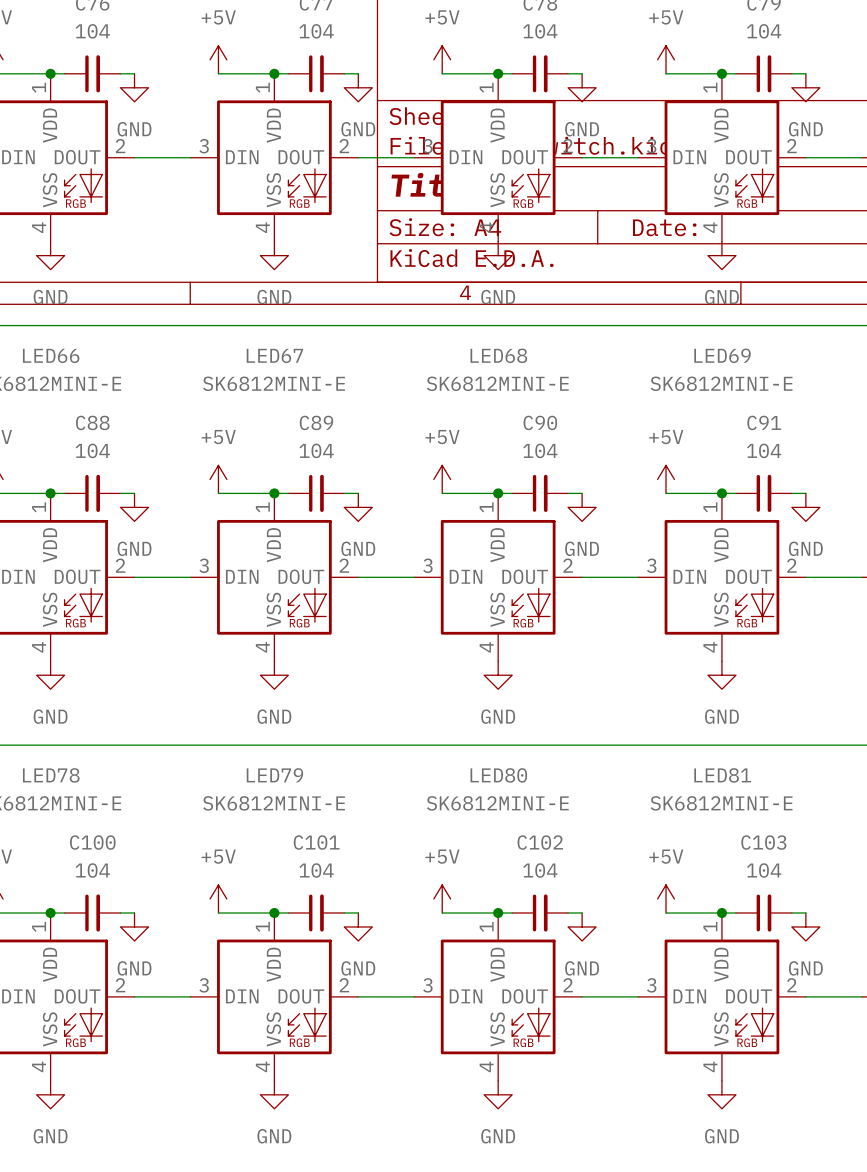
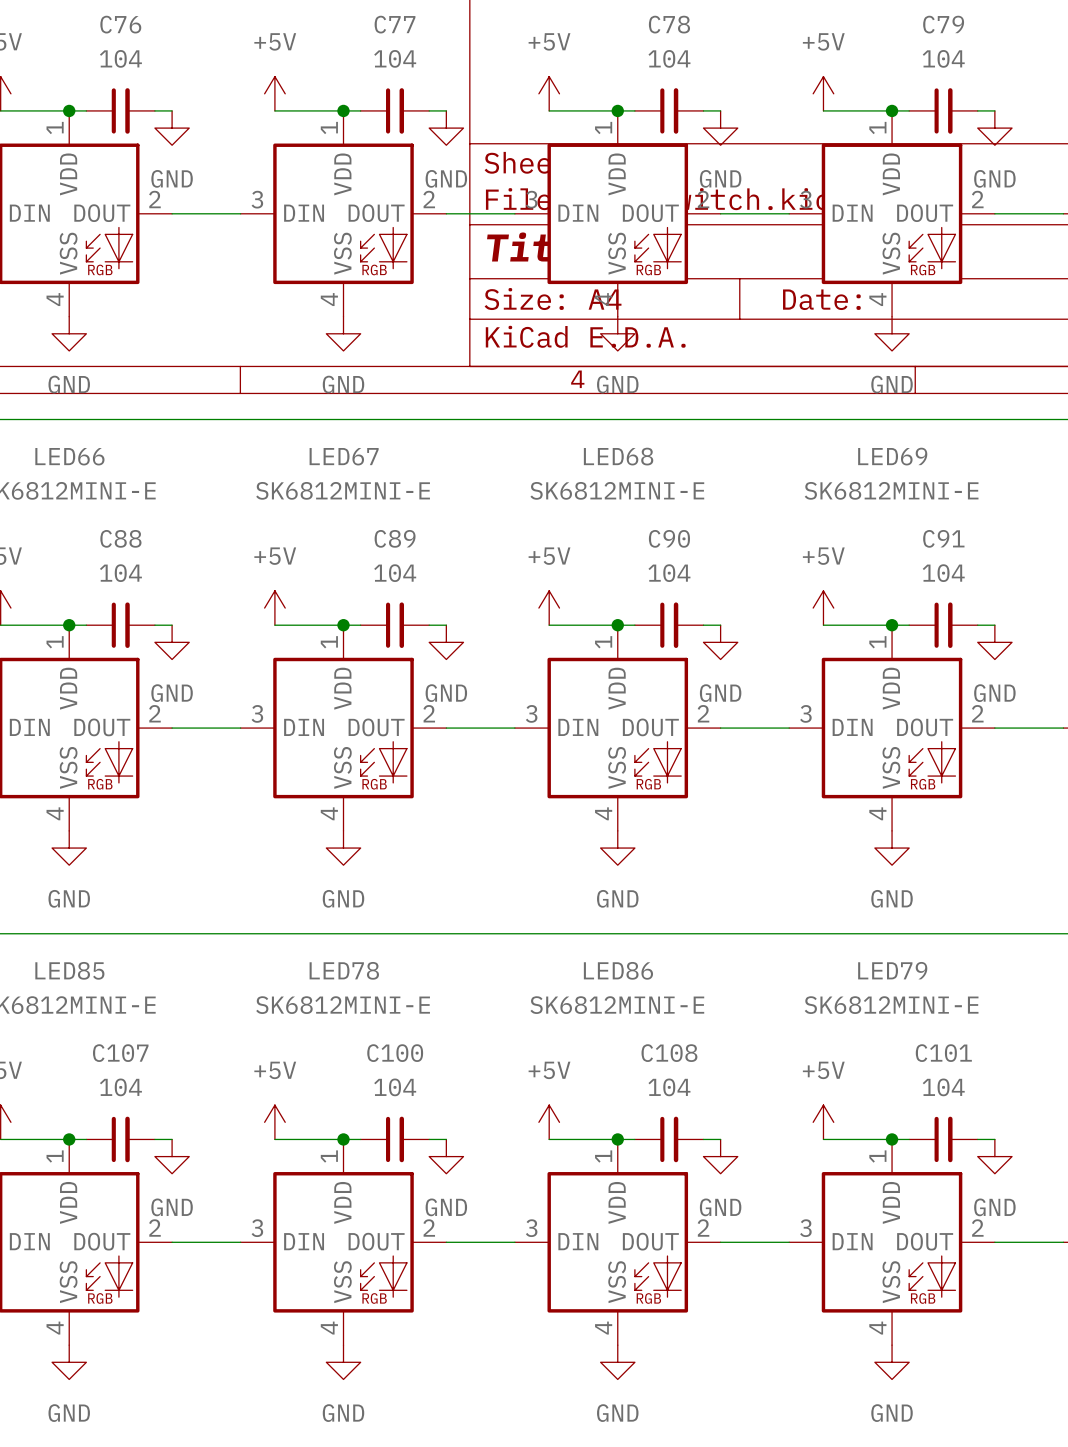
LED78 name: LED78 (51, 775) -> LED85 (69, 970)
LED79 name: LED79 (274, 775) -> LED78 (344, 970)
LED80 name: LED80 (498, 775) -> LED86 (618, 970)
LED81 name: LED81 (722, 775) -> LED79 (892, 970)
C100 name: C100 (92, 842) -> C107 (120, 1053)
C101 name: C101 (316, 842) -> C100 (395, 1053)
C102 name: C102 (540, 842) -> C108 (669, 1053)
C103 name: C103 (763, 842) -> C101 (943, 1053)

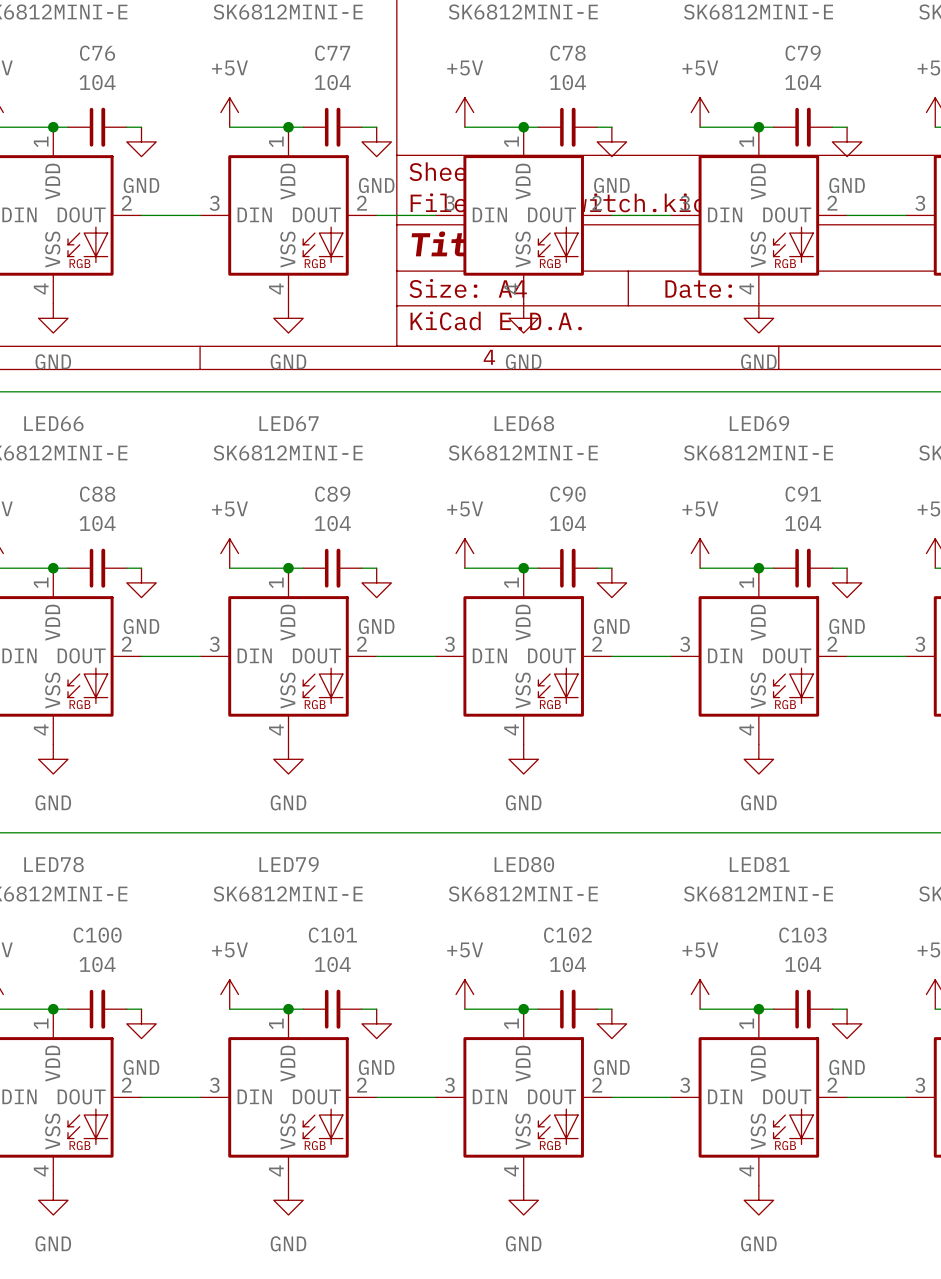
LED85 name: LED85 (69, 970) -> LED78 (53, 864)
LED78 name: LED78 (344, 970) -> LED79 (289, 864)
LED86 name: LED86 (618, 970) -> LED80 (524, 864)
LED79 name: LED79 (892, 970) -> LED81 (759, 864)
C107 name: C107 (120, 1053) -> C100 (97, 935)
C100 name: C100 (395, 1053) -> C101 (332, 935)
C108 name: C108 (669, 1053) -> C102 (567, 935)
C101 name: C101 (943, 1053) -> C103 (802, 935)

